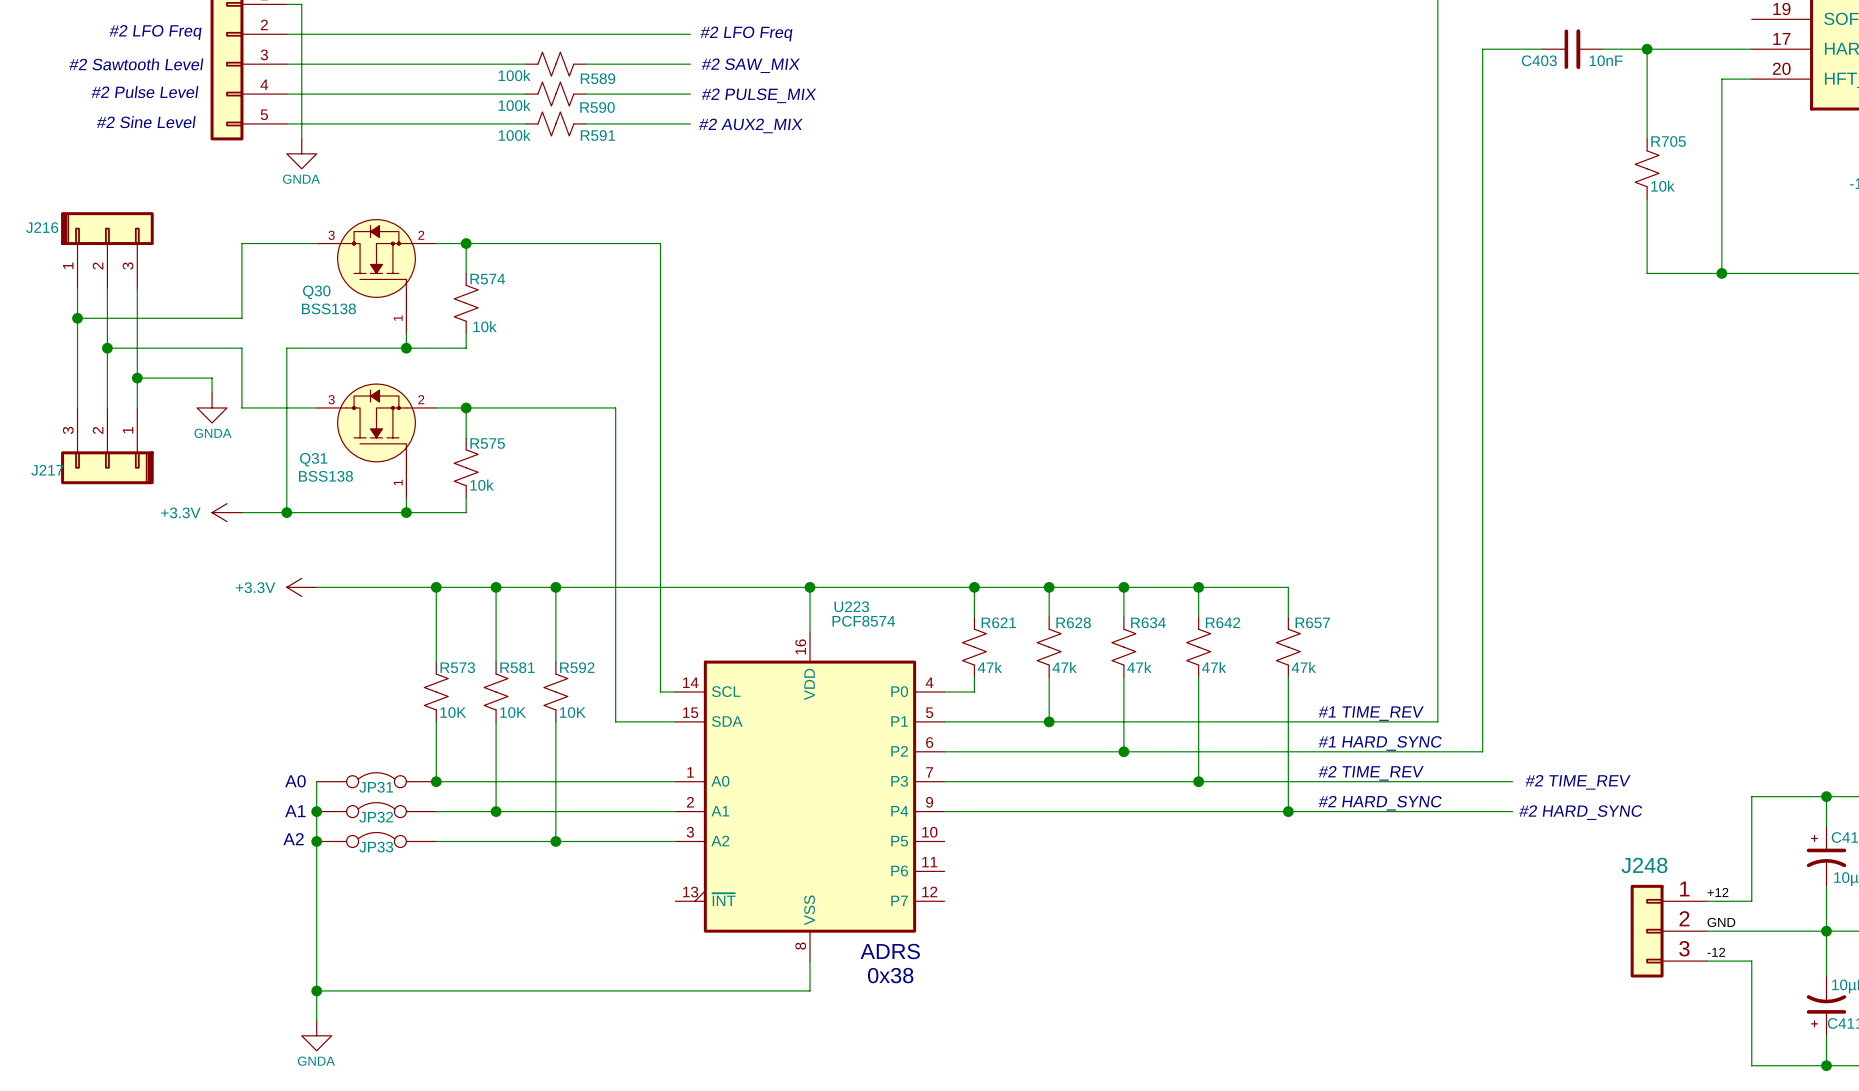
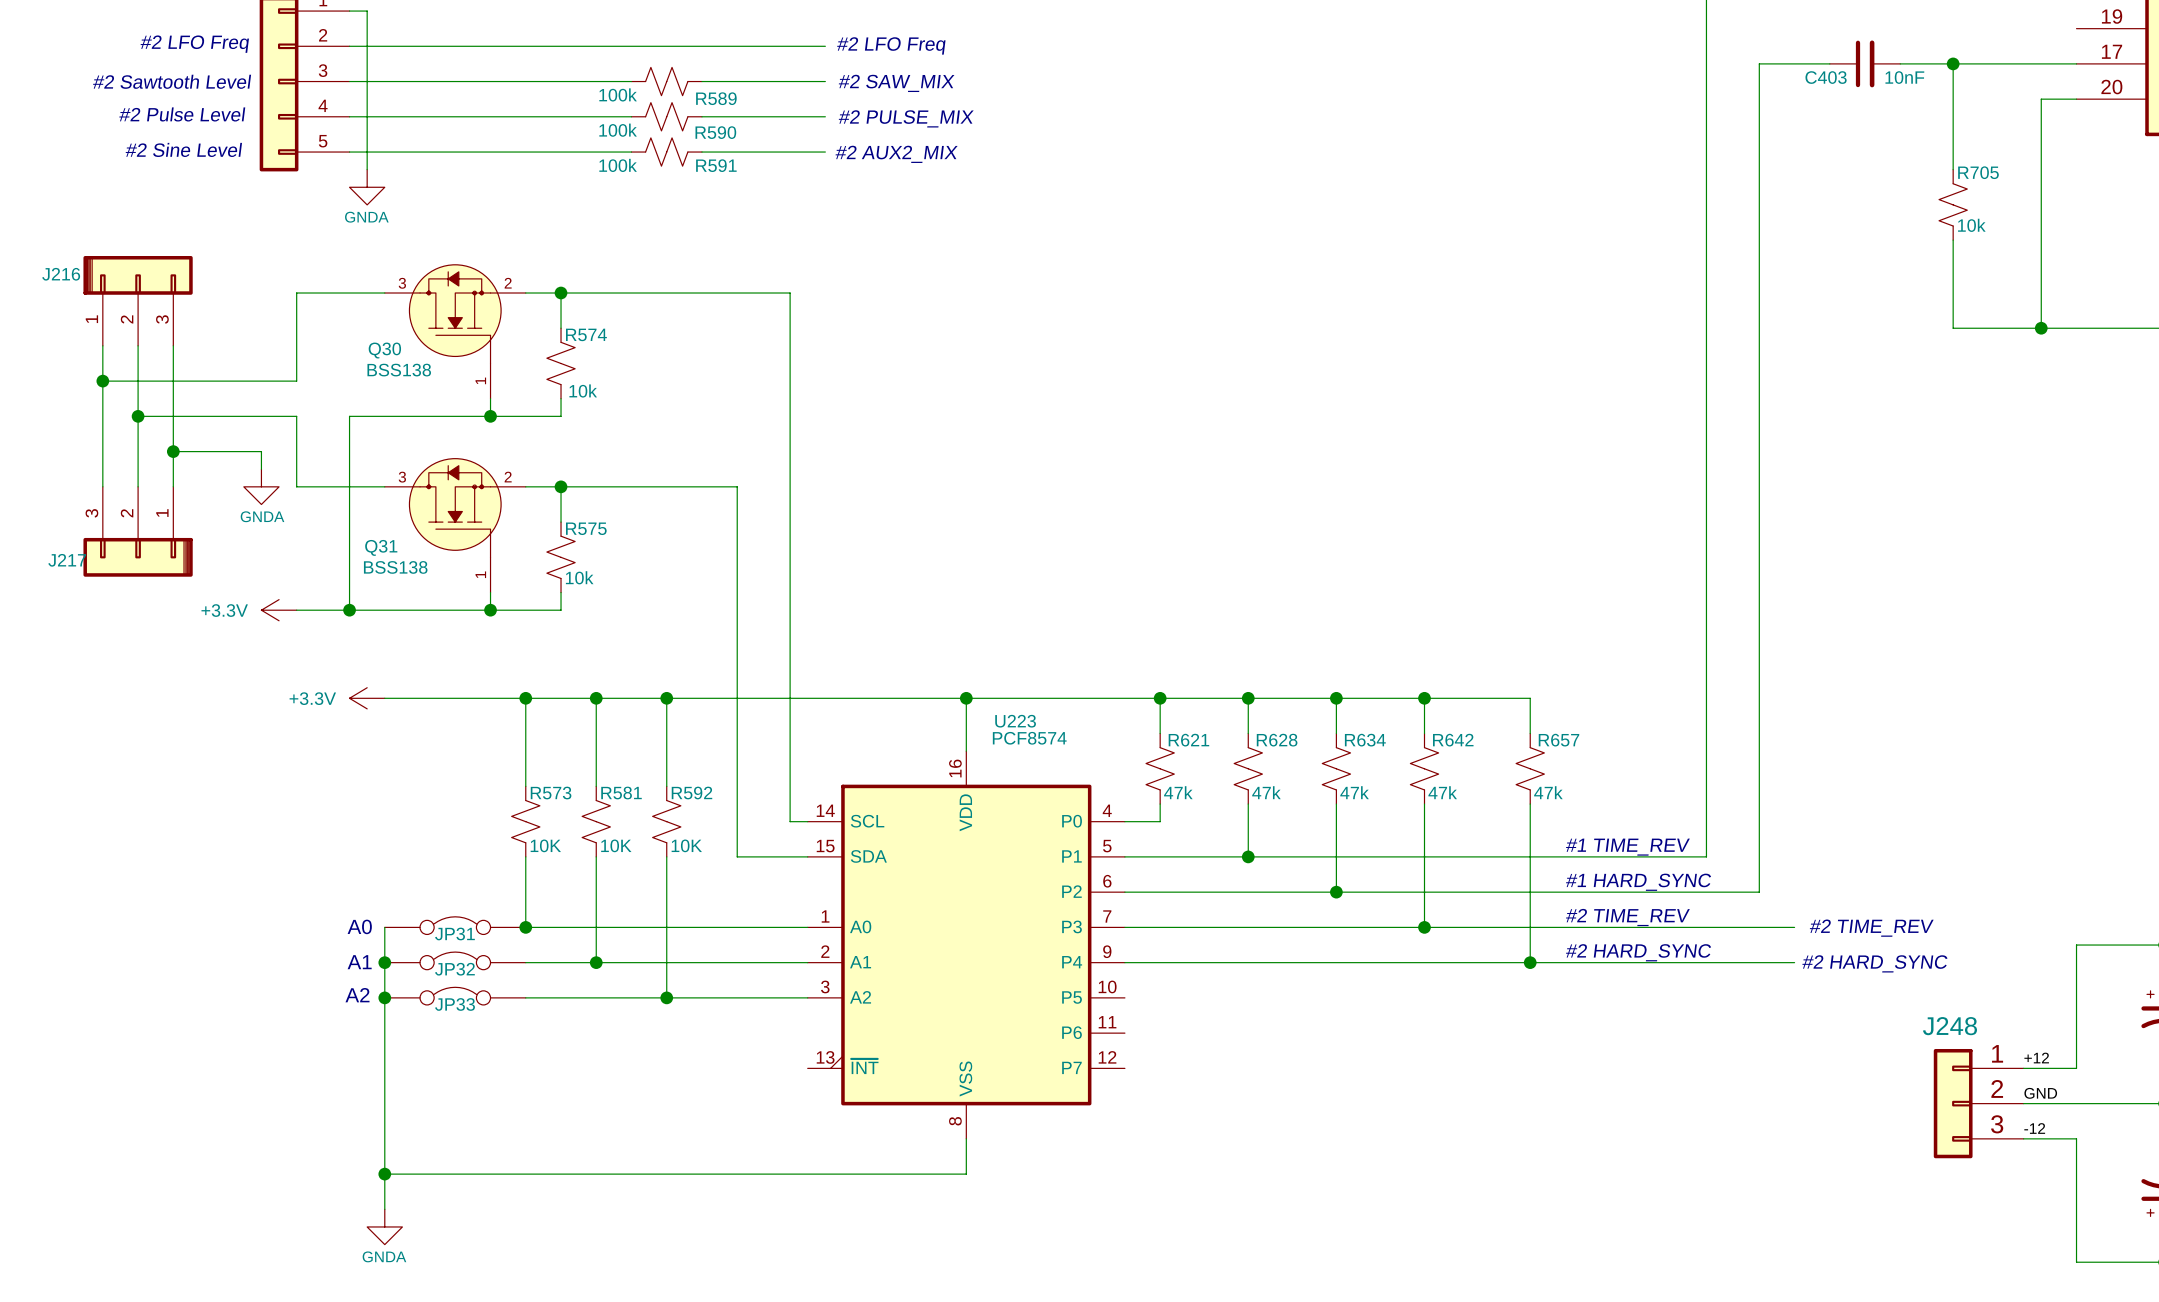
text: ADRS (890, 951) -> none
text: 0x38 (890, 975) -> none

